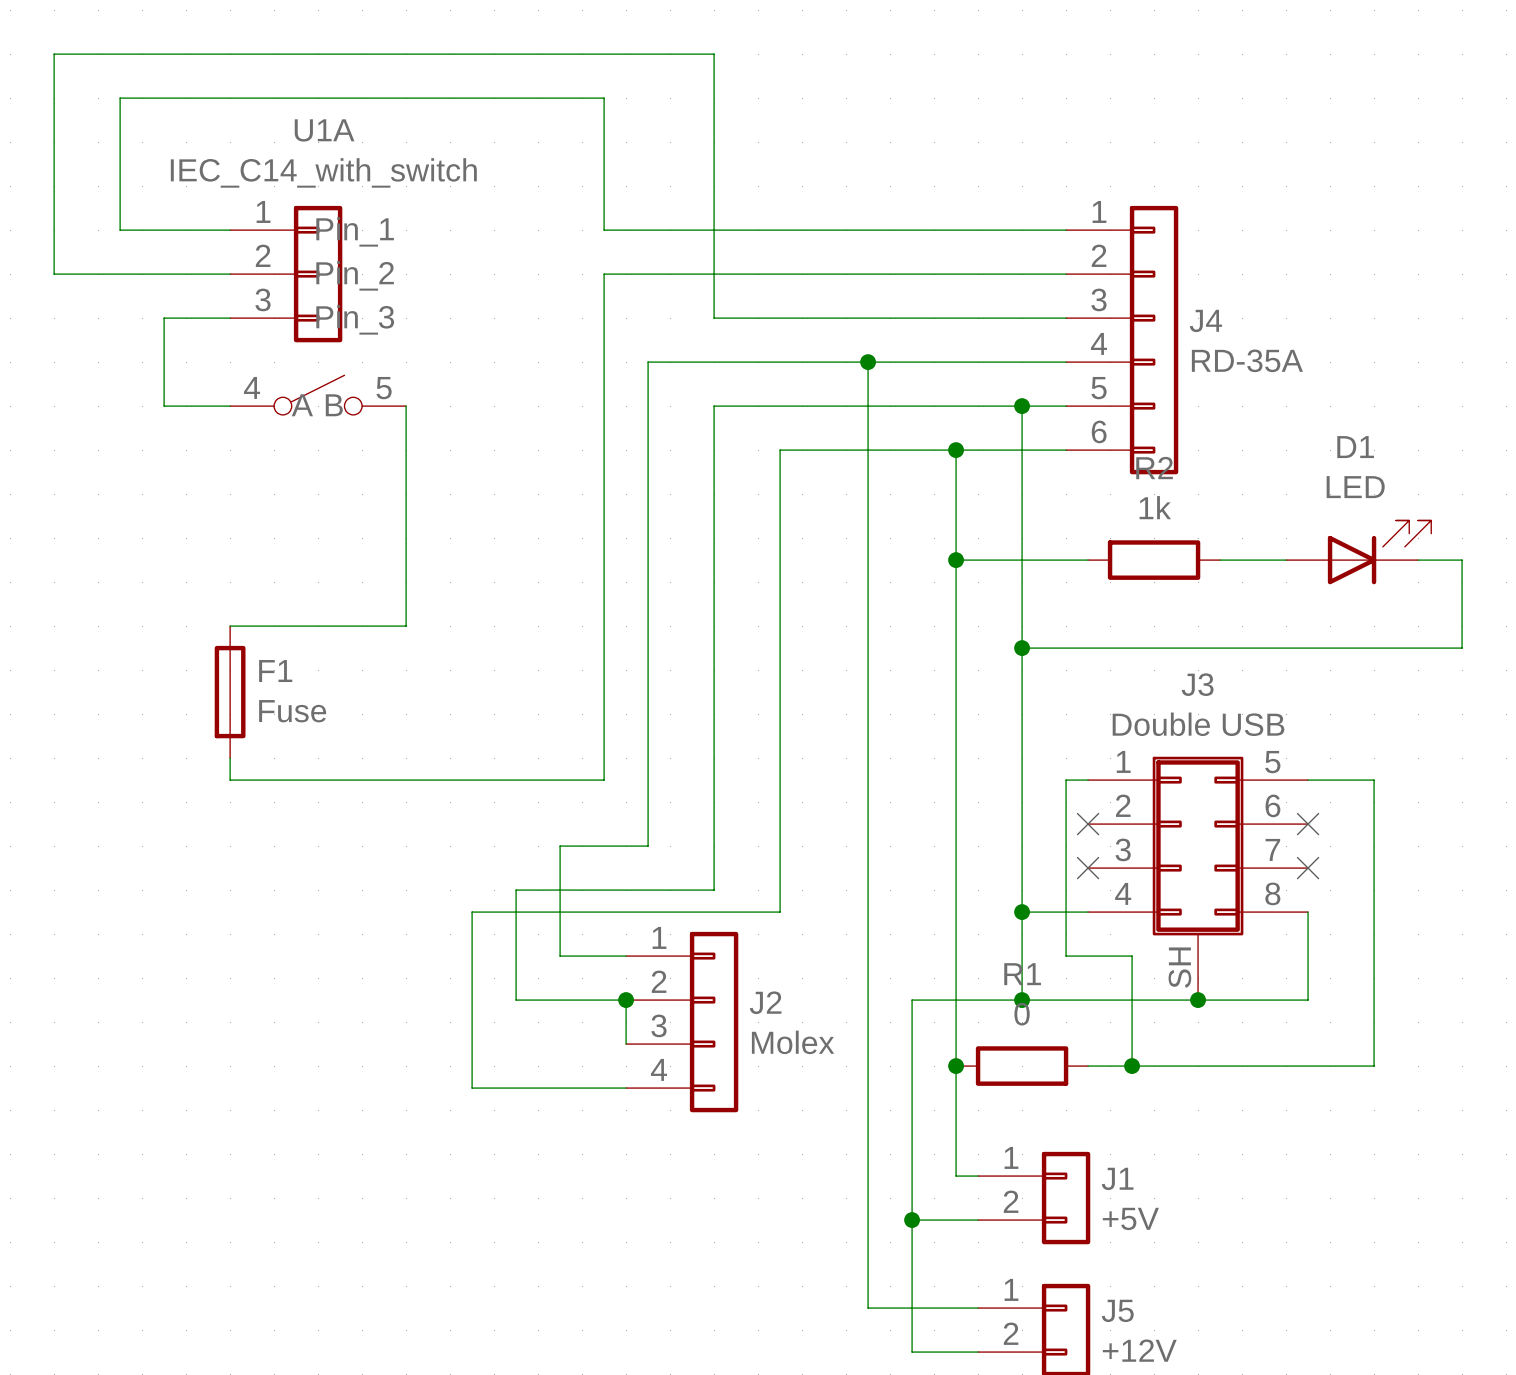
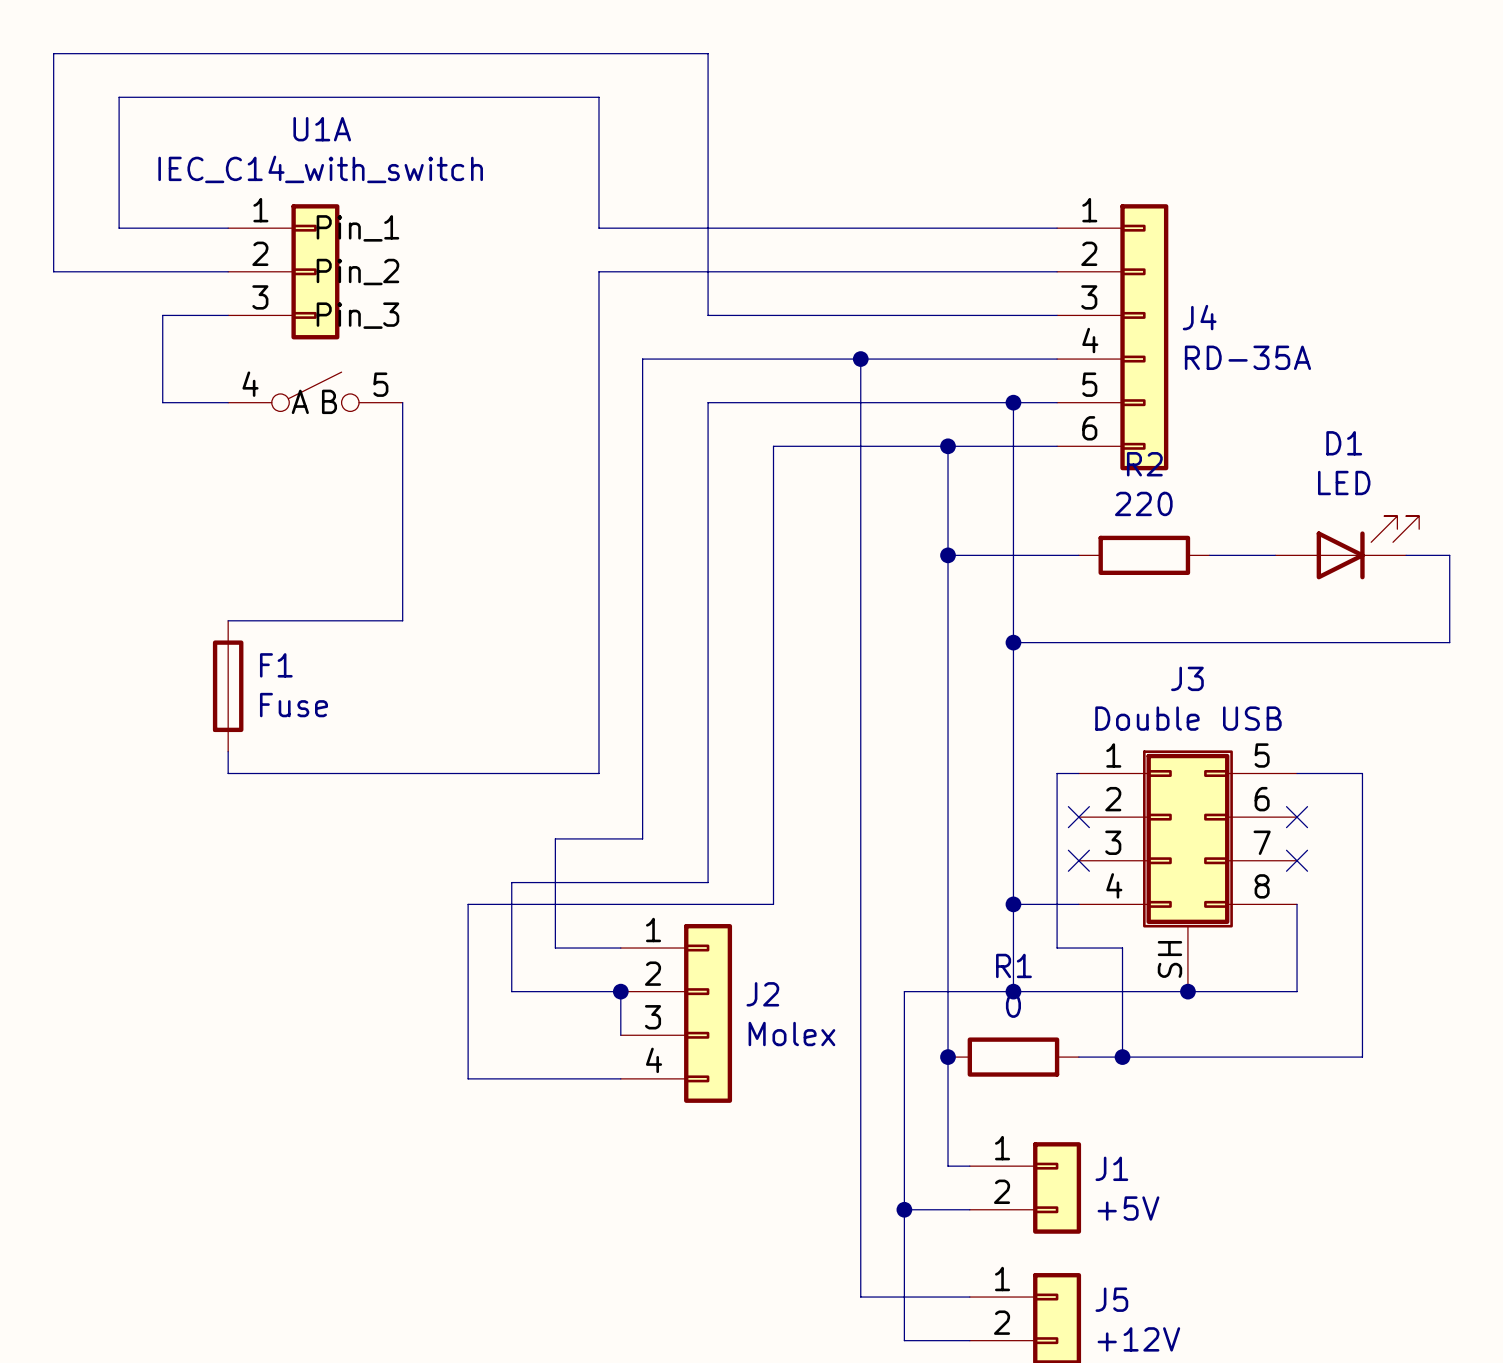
R2 value: 1k (1155, 507) -> 220 (1143, 503)

